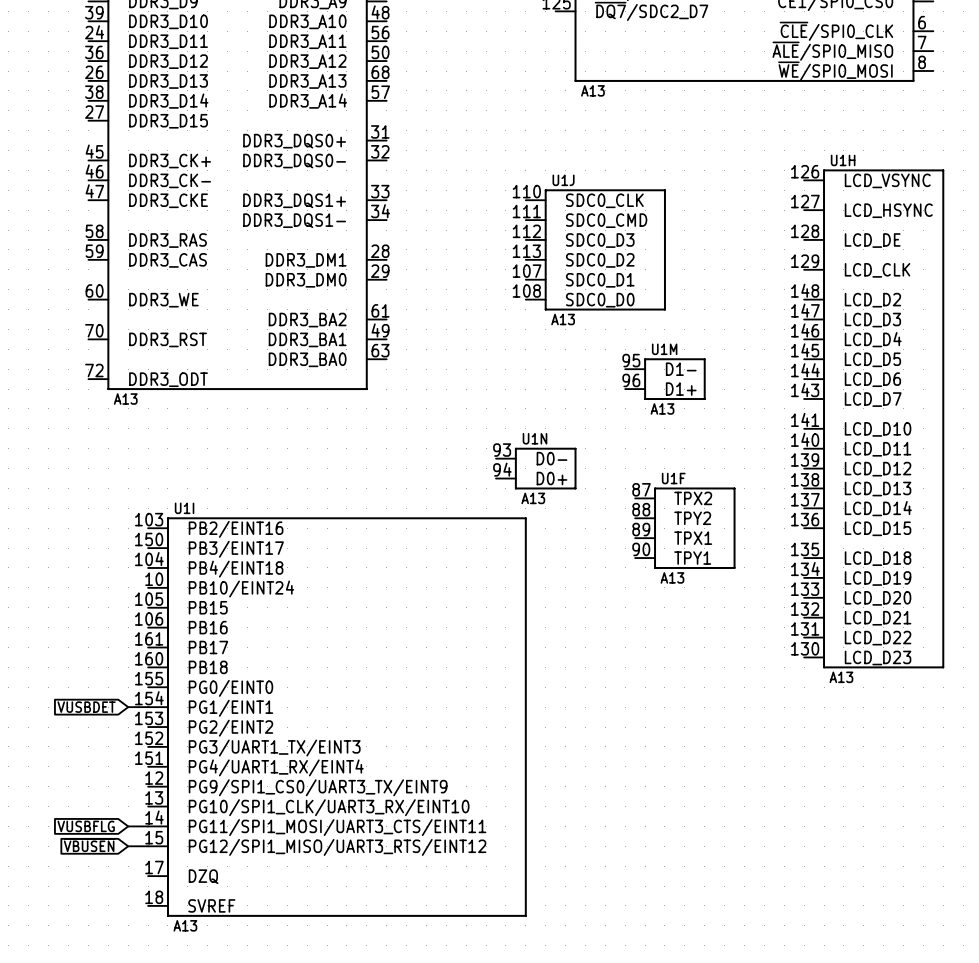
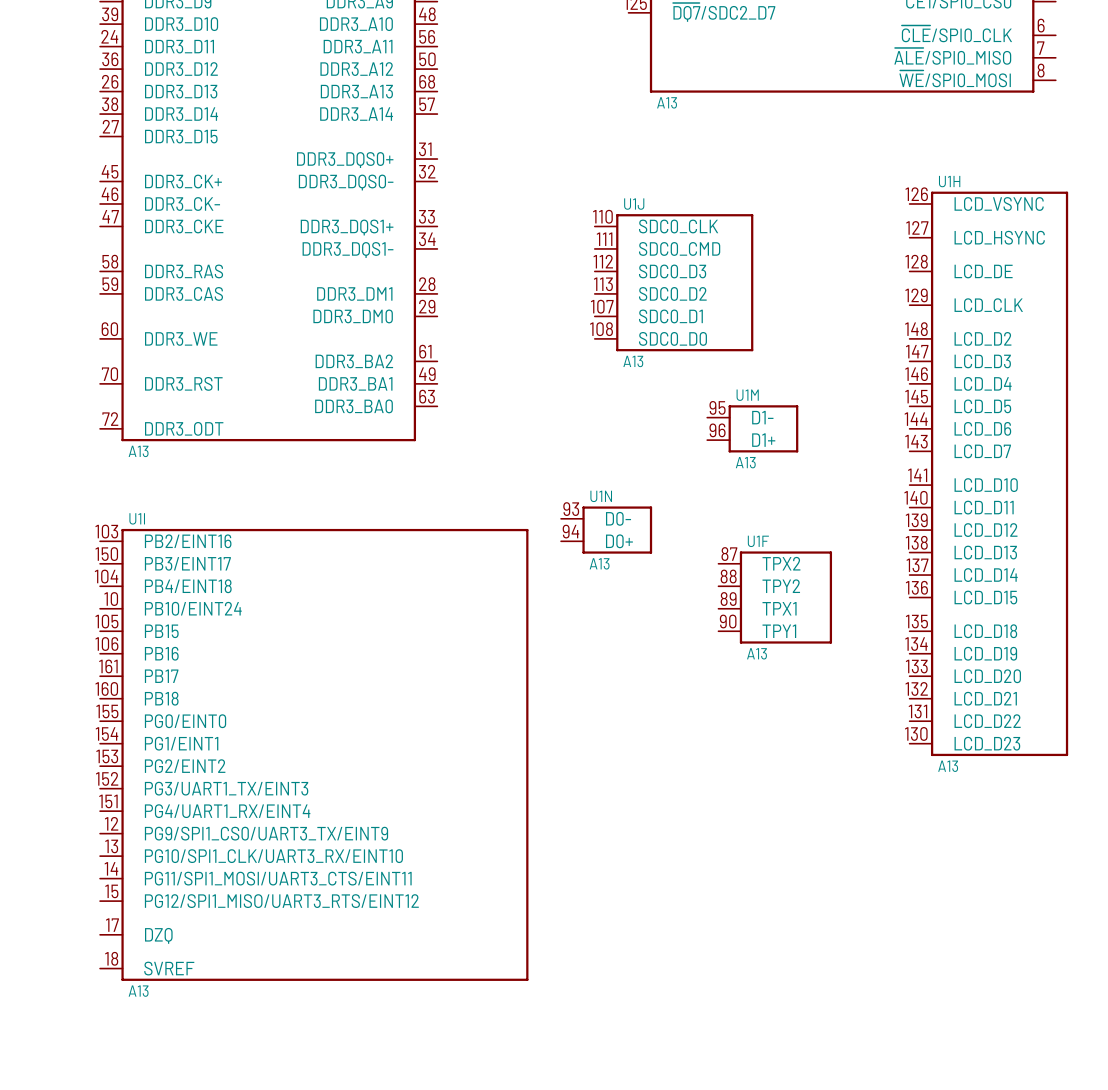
global label: VUSBDET (86, 707) -> none
wire: (128, 707) (148, 707) -> none
U1I position: (337, 717) -> (314, 754)
global label: VUSBFLG (86, 826) -> none
wire: (128, 826) (148, 826) -> none
global label: ~{VBUSEN} (89, 845) -> none
wire: (128, 846) (148, 846) -> none

